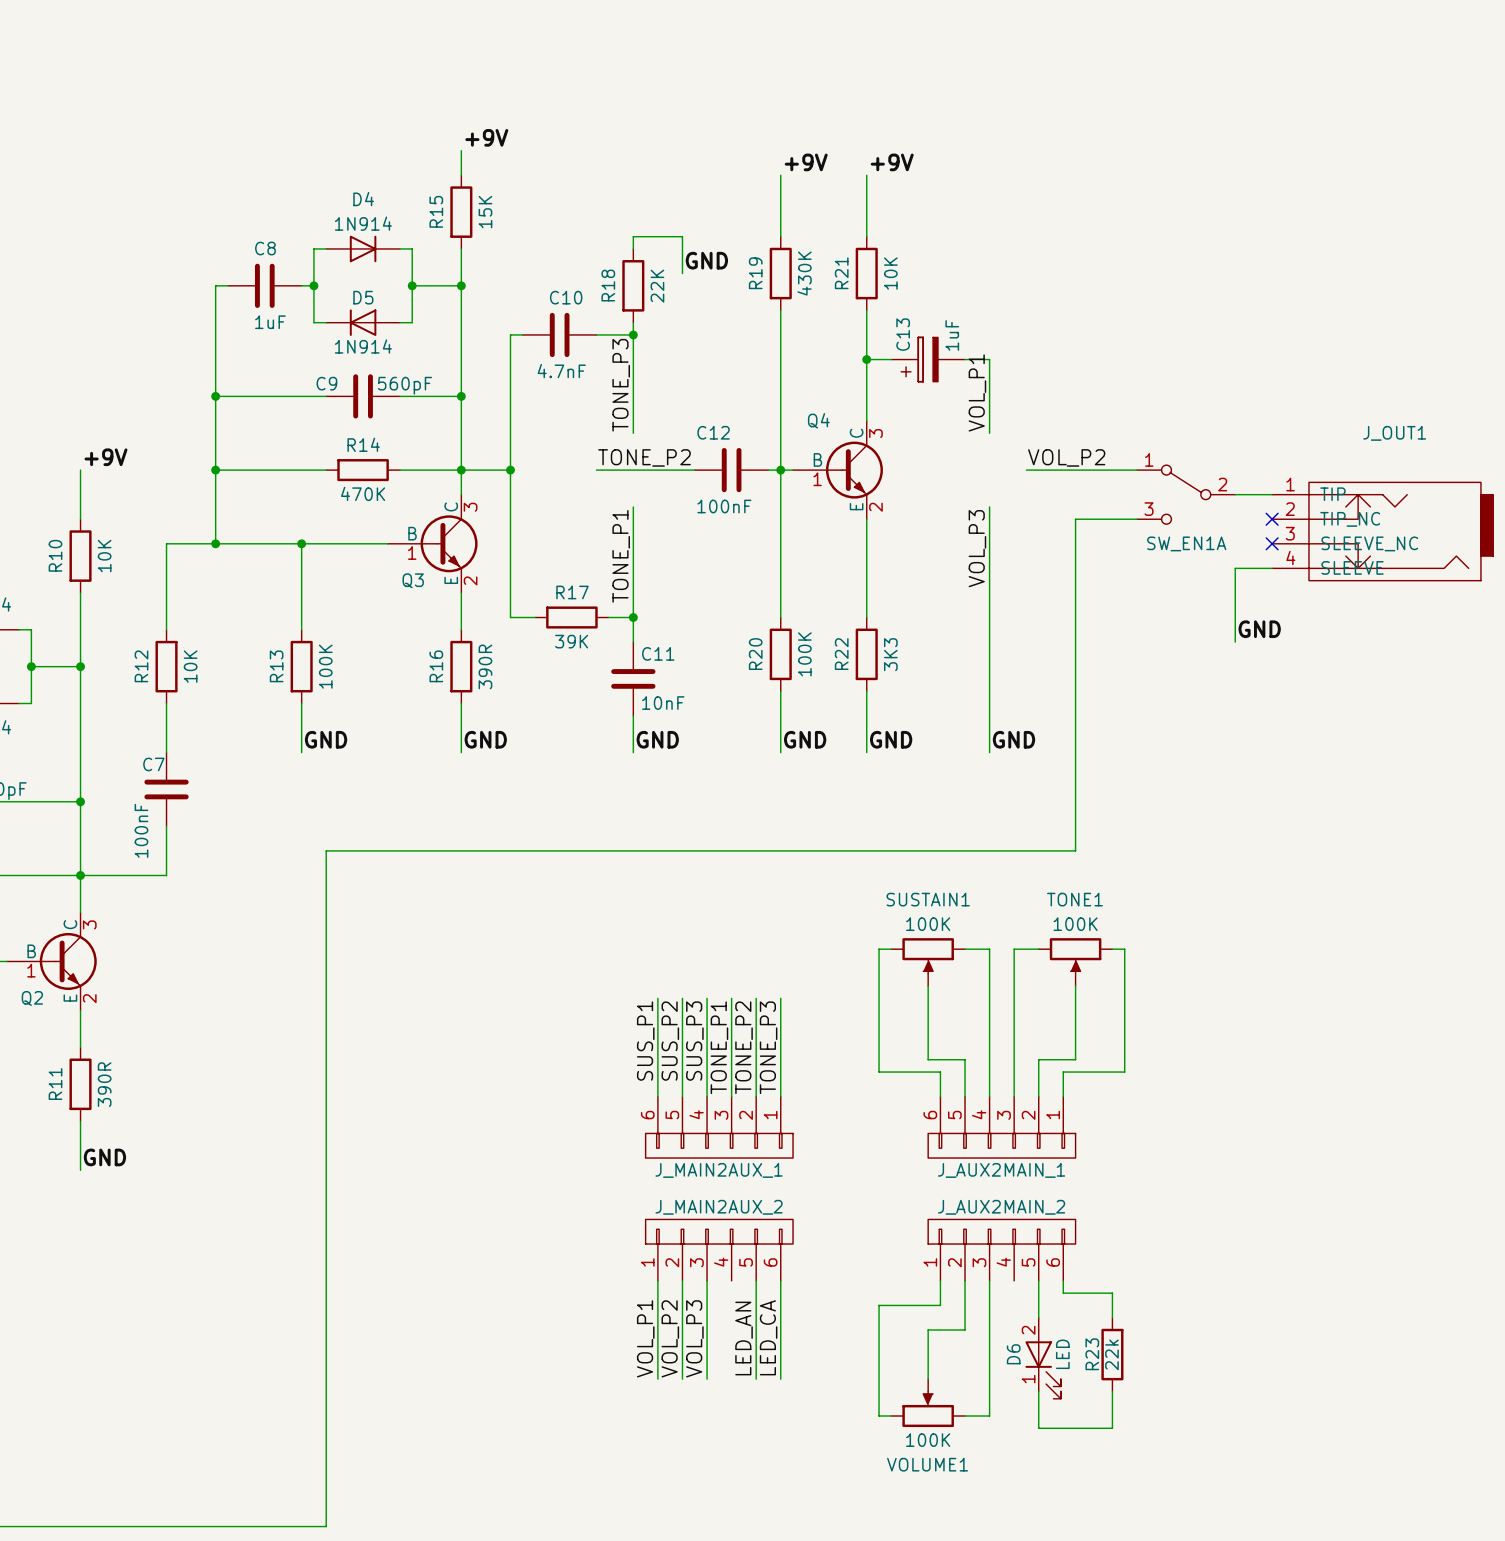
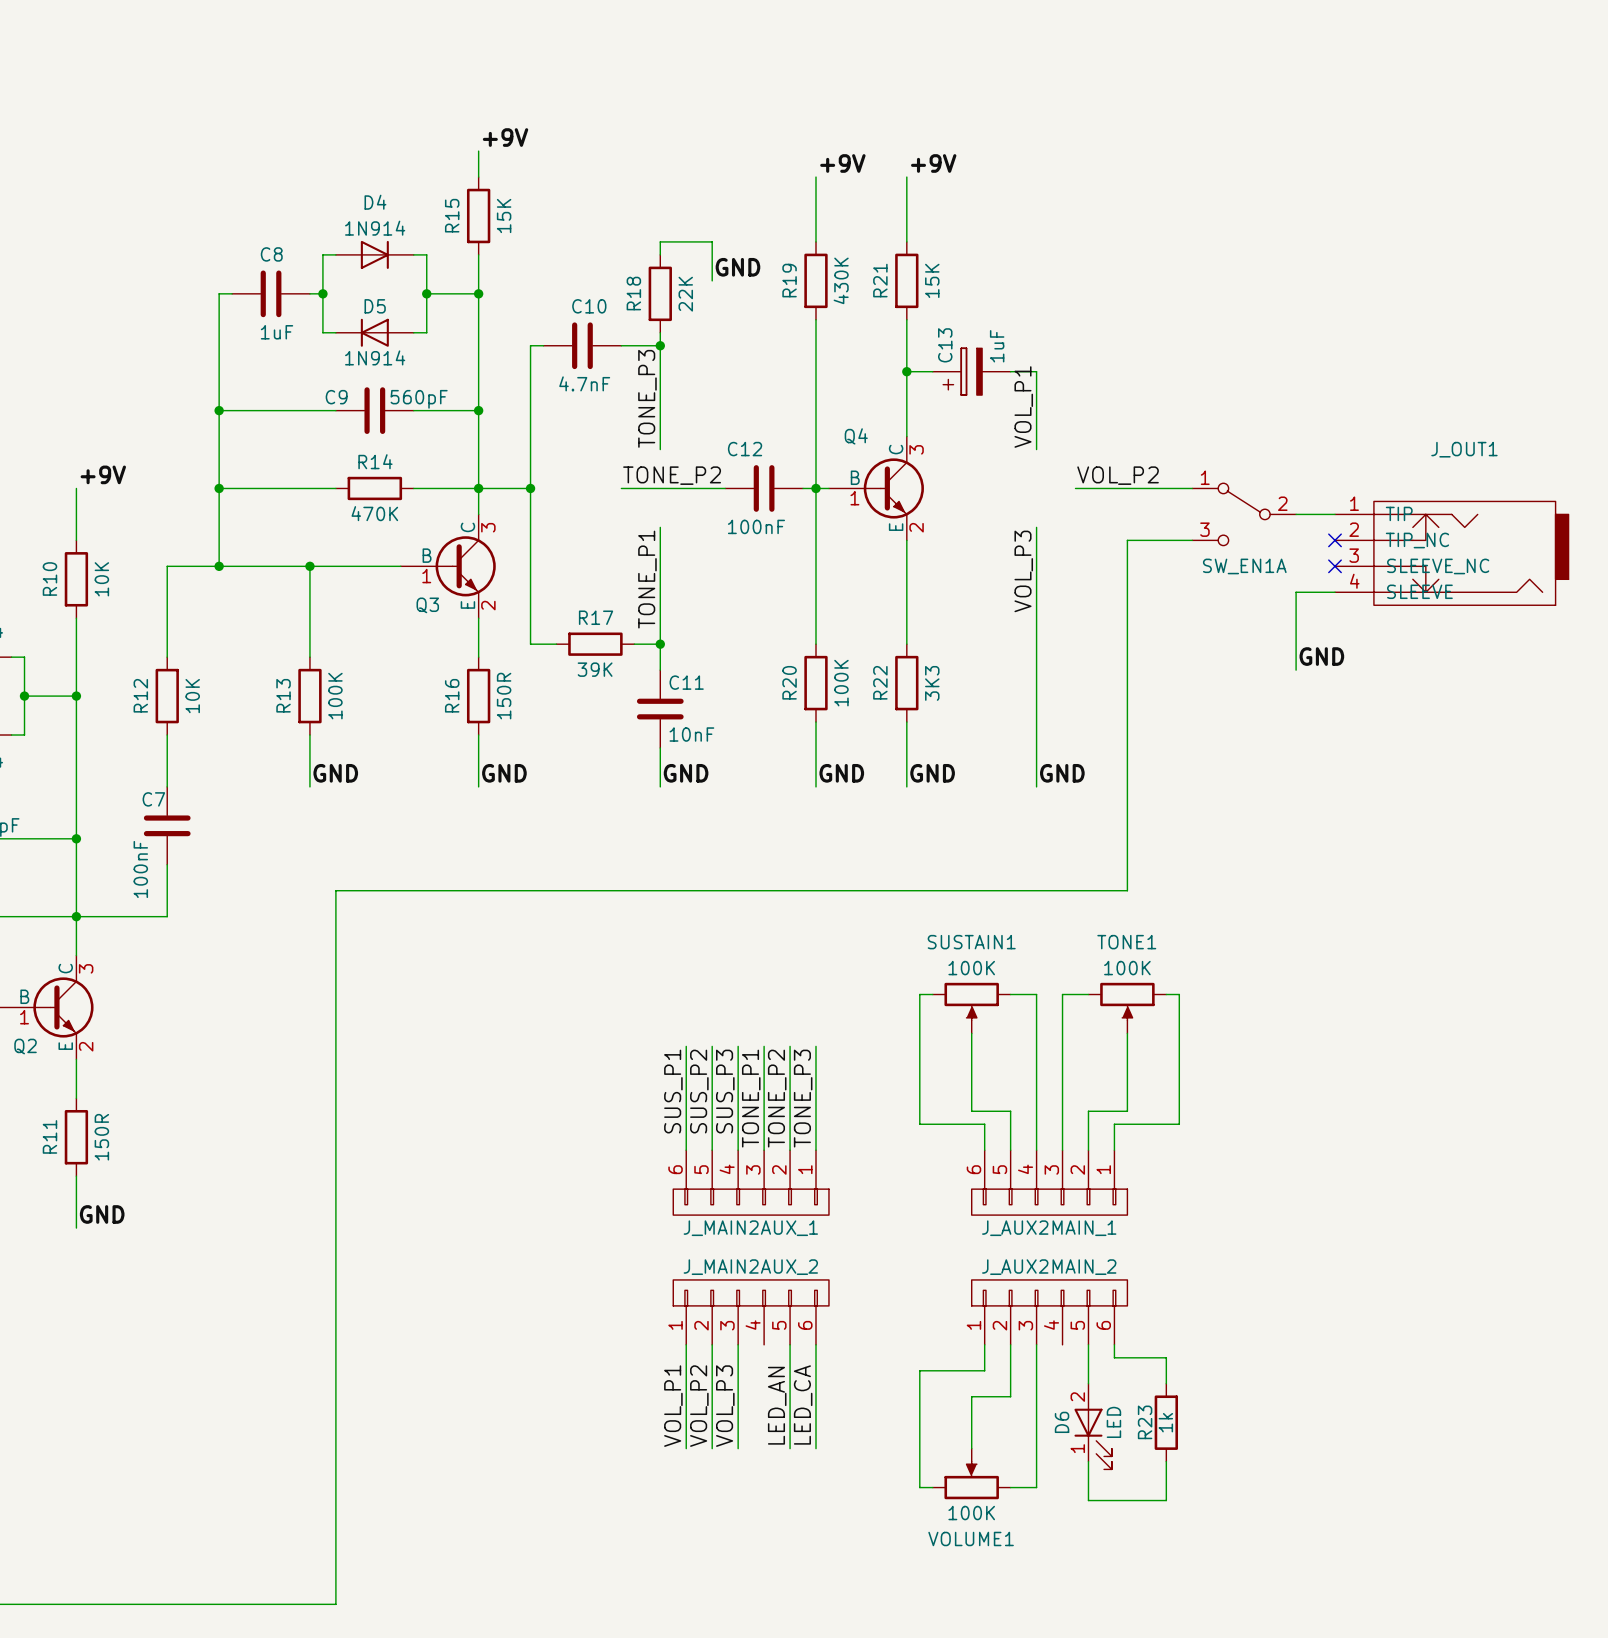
R21 value: 10K (890, 273) -> 15K (932, 280)
R16 value: 390R (485, 666) -> 150R (504, 696)
R11 value: 390R (104, 1084) -> 150R (101, 1137)
R23 value: 22k (1111, 1354) -> 1k (1165, 1422)

